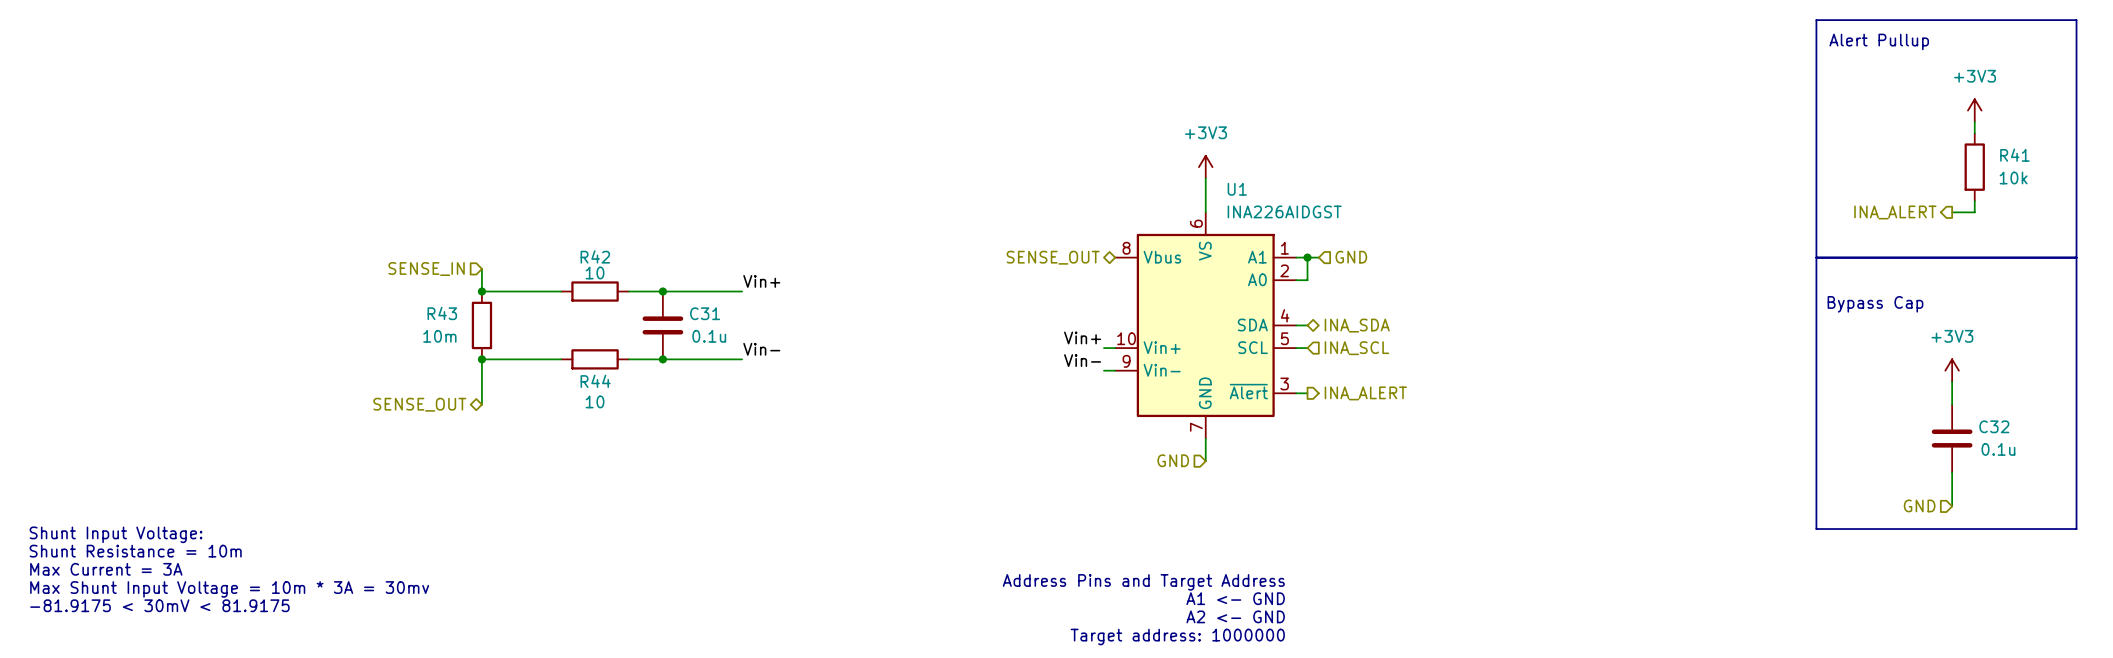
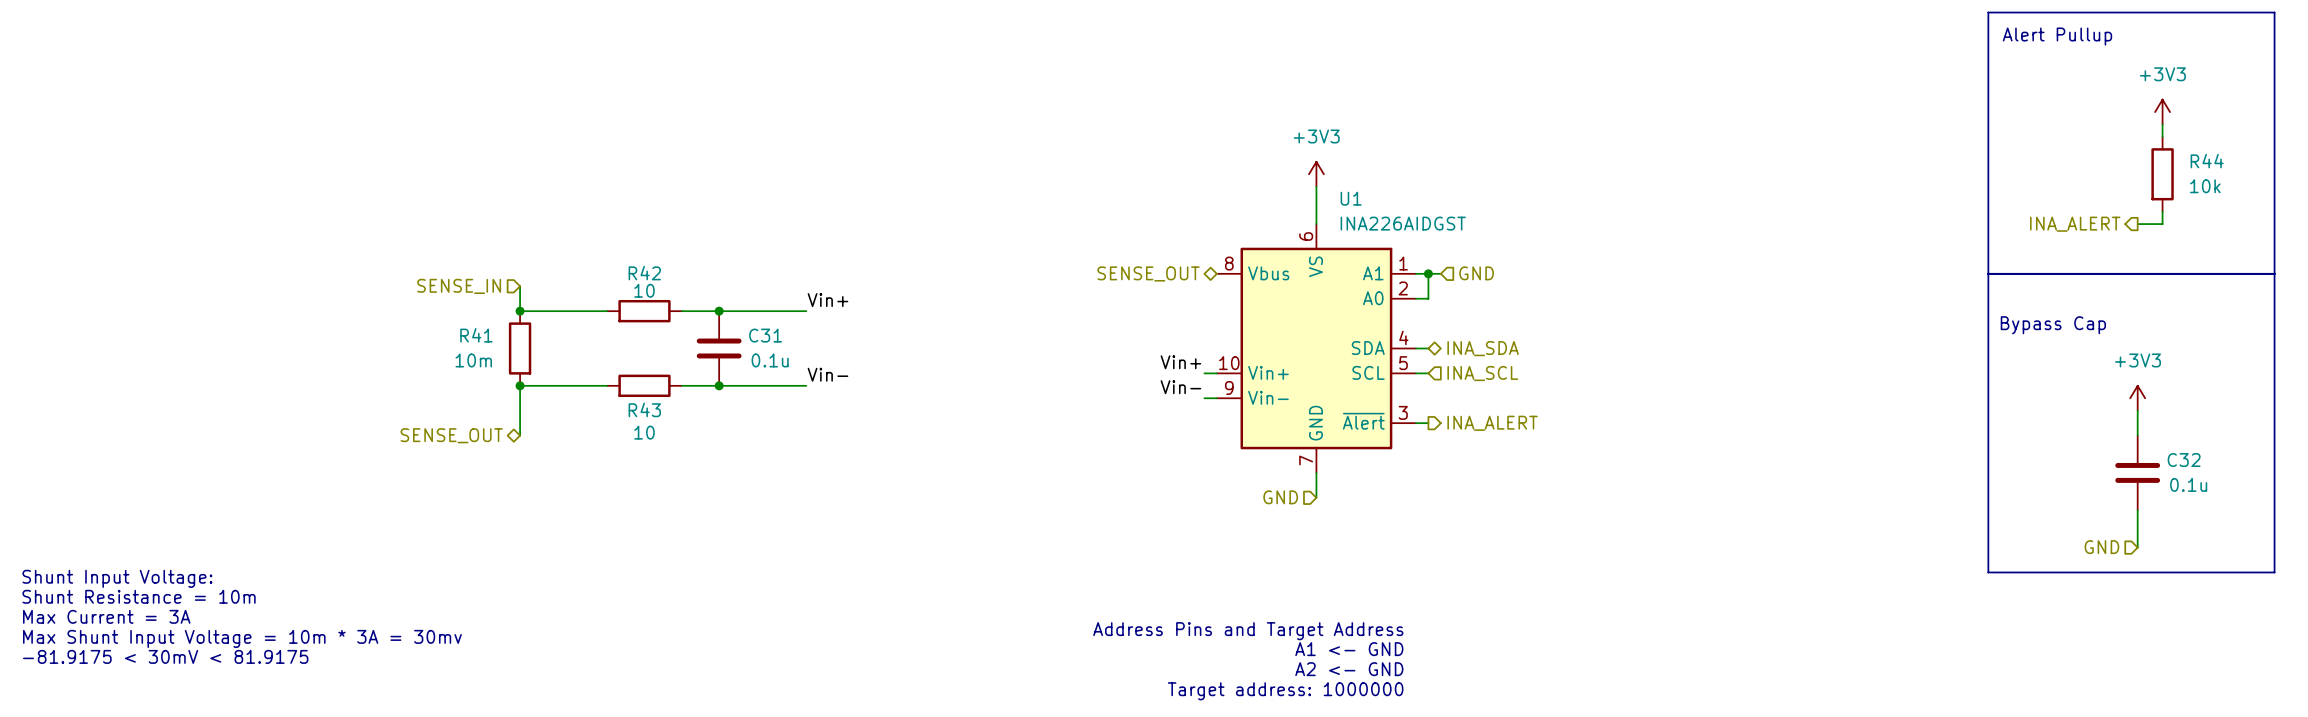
R41 name: R41 (2014, 155) -> R44 (2207, 161)
R43 name: R43 (442, 313) -> R41 (476, 335)
R44 name: R44 (595, 381) -> R43 (644, 409)

